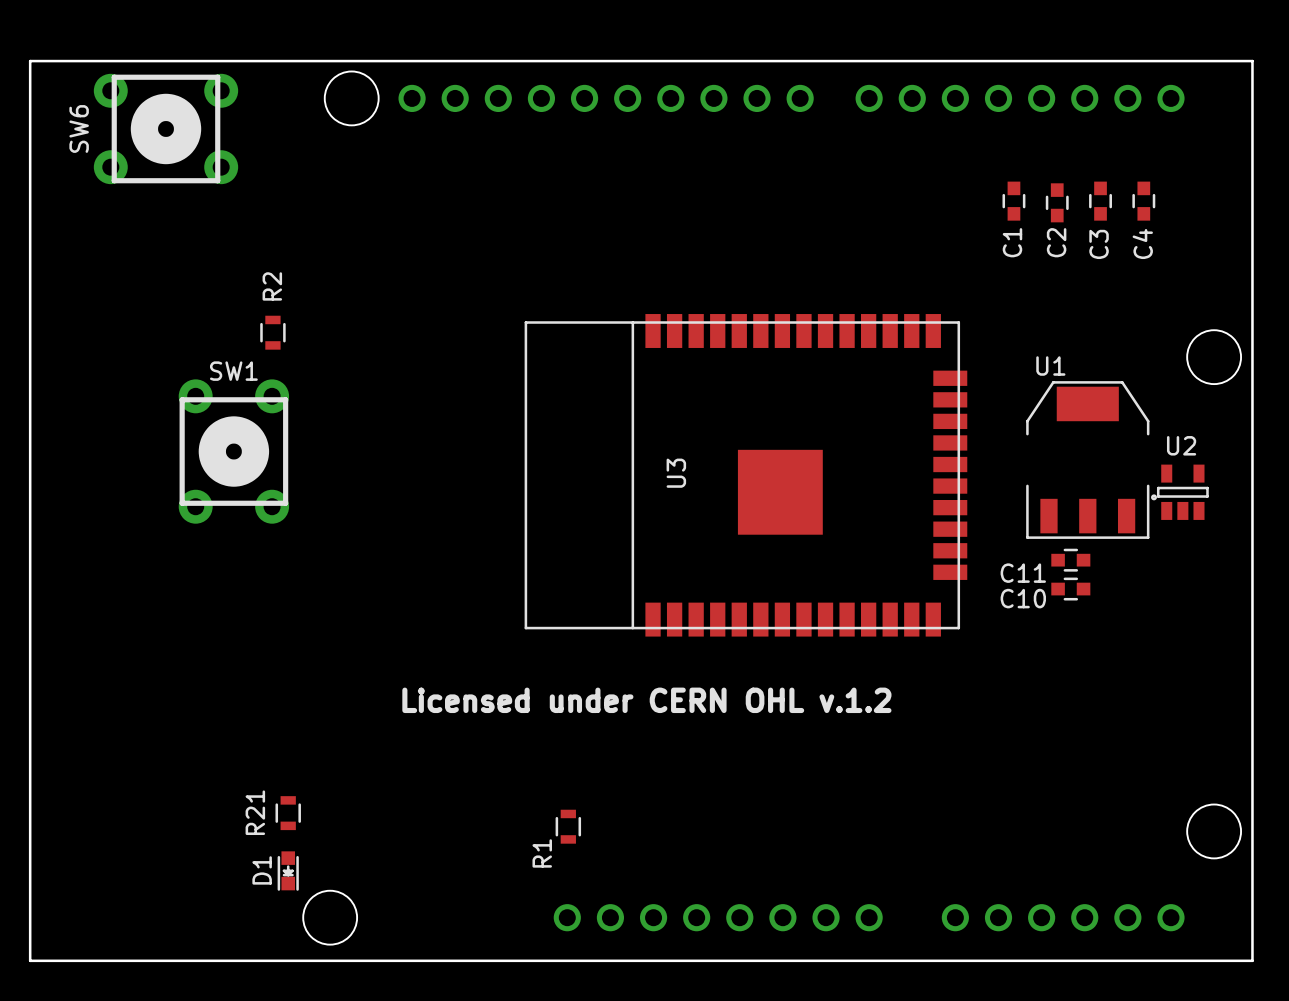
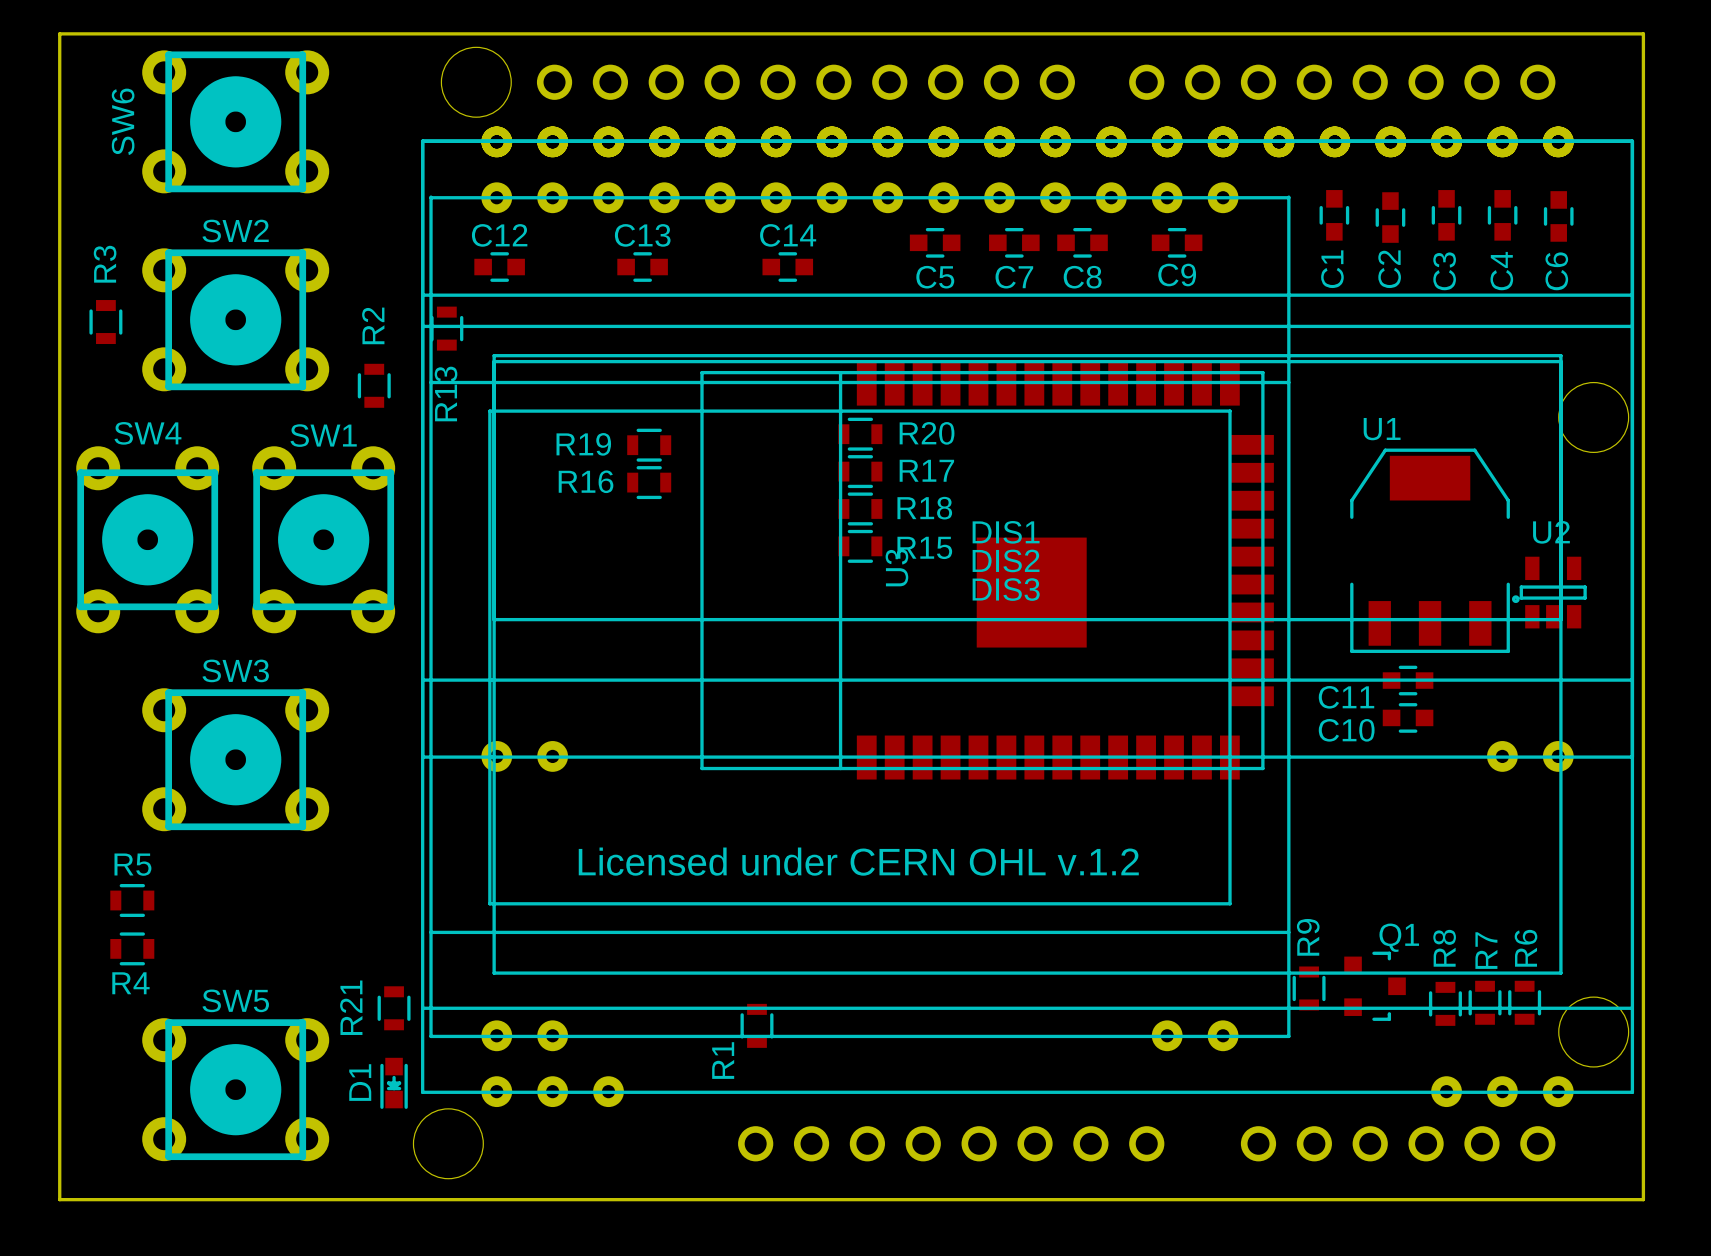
C6: none -> (1558, 216)
C5: none -> (935, 242)
C7: none -> (1014, 242)
C8: none -> (1082, 242)
C9: none -> (1177, 242)
C12: none -> (499, 267)
C13: none -> (642, 267)
C14: none -> (787, 267)
SW2: none -> (235, 319)
R3: none -> (105, 322)
R13: none -> (446, 328)
R20: none -> (860, 434)
R19: none -> (649, 445)
DIS2: none -> (1027, 449)
R17: none -> (860, 471)
R16: none -> (649, 482)
R18: none -> (860, 508)
SW4: none -> (147, 539)
R15: none -> (860, 546)
DIS3: none -> (859, 616)
DIS1: none -> (1027, 616)
SW3: none -> (235, 759)
R4: none -> (132, 900)
R5: none -> (132, 948)
Q1: none -> (1375, 986)
R9: none -> (1309, 988)
R7: none -> (1485, 1002)
R6: none -> (1524, 1002)
R8: none -> (1445, 1003)
SW5: none -> (235, 1089)

